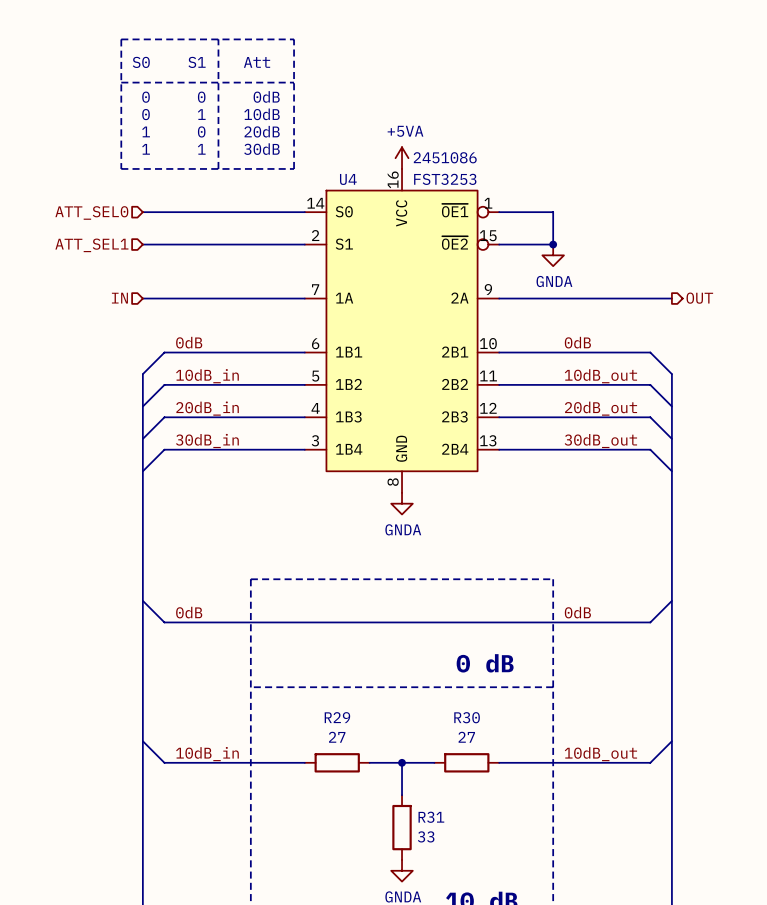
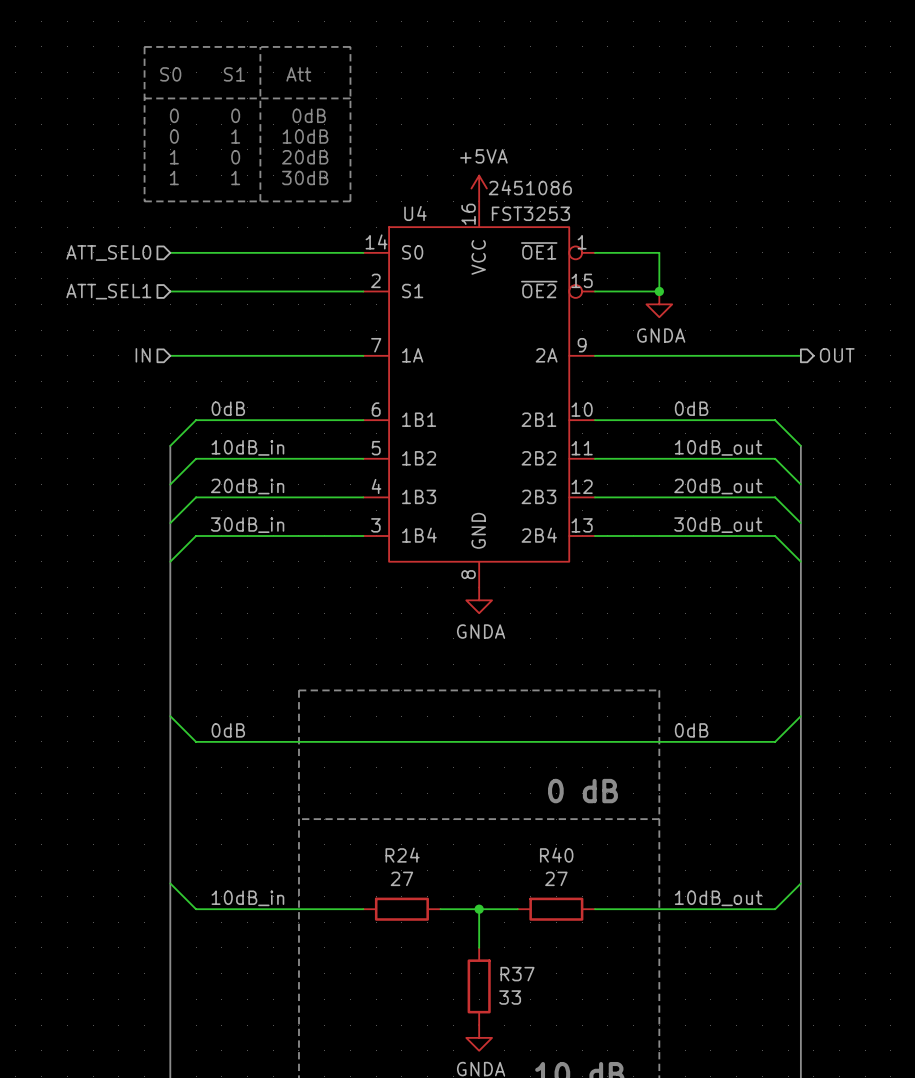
R29 name: R29 (337, 717) -> R24 (402, 855)
R30 name: R30 (467, 717) -> R40 (556, 855)
R31 name: R31 (431, 817) -> R37 (517, 974)

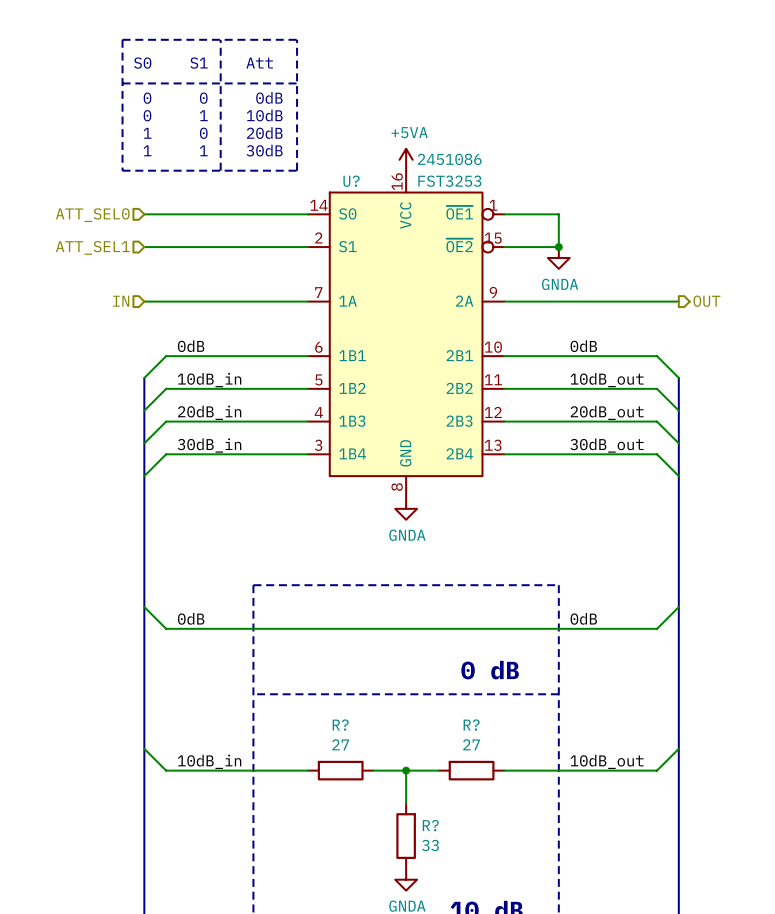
U4 name: U4 (415, 213) -> U? (351, 181)
R24 name: R24 (402, 855) -> R? (340, 725)
R40 name: R40 (556, 855) -> R? (471, 725)
R37 name: R37 (517, 974) -> R? (430, 825)

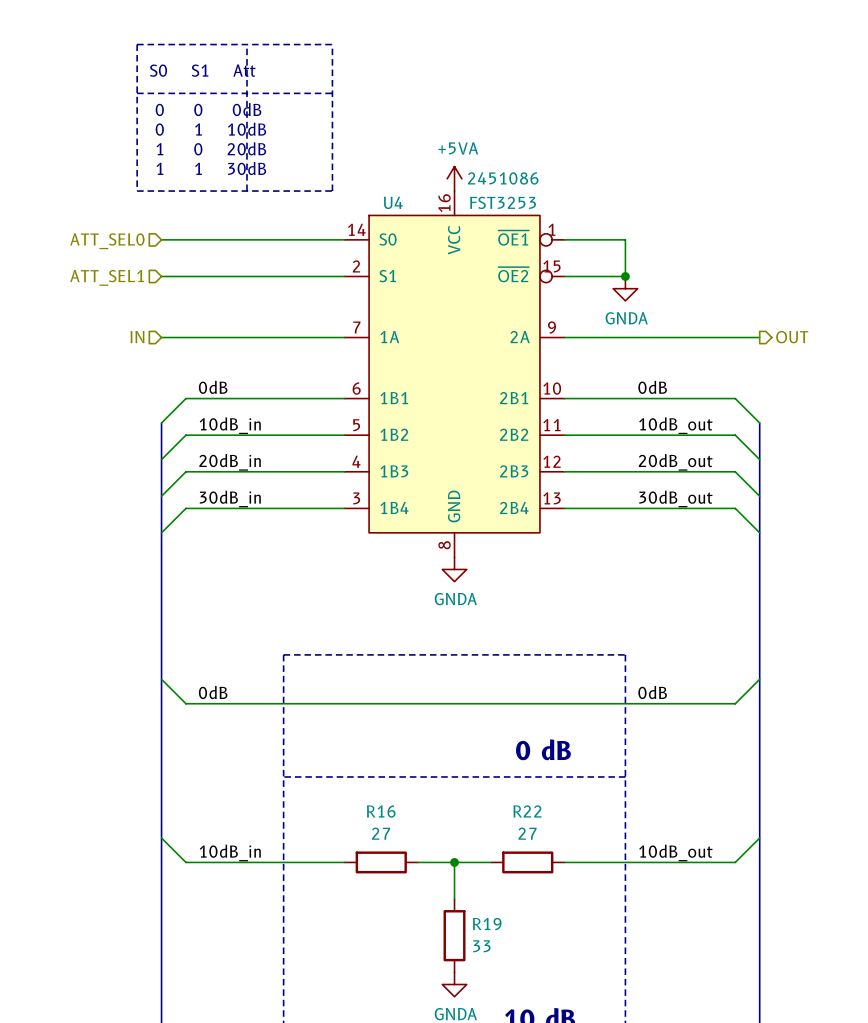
U? name: U? (351, 181) -> U4 (393, 202)
R? name: R? (340, 725) -> R16 (381, 811)
R? name: R? (471, 725) -> R22 (527, 811)
R? name: R? (430, 825) -> R19 (487, 924)

